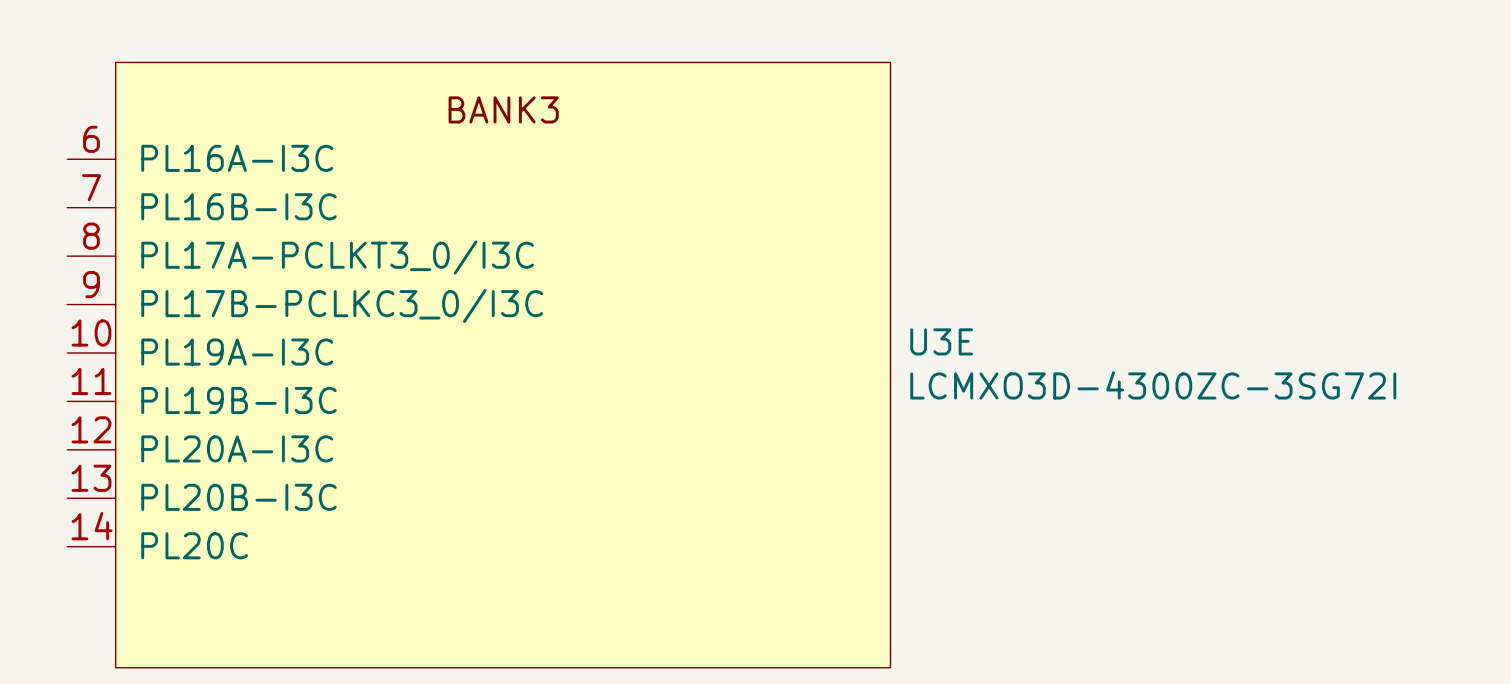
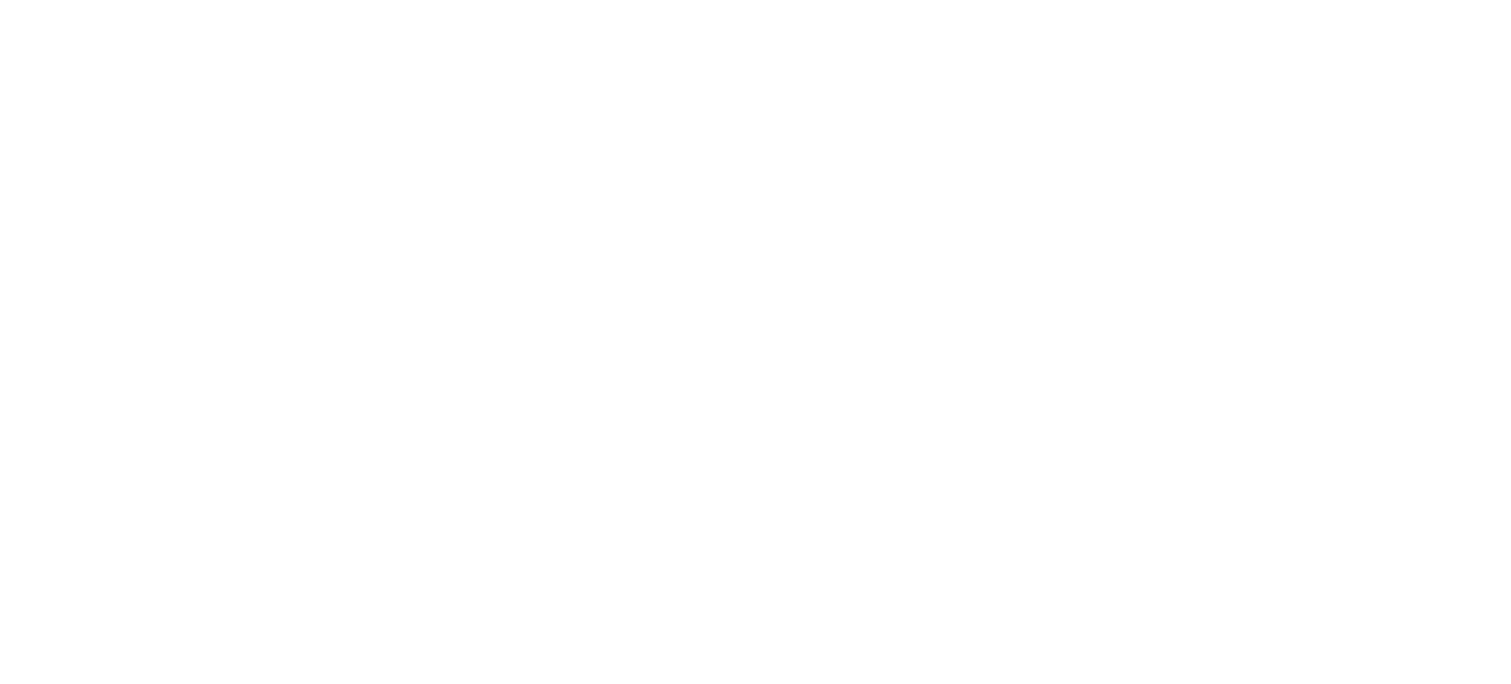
U3E: LCMXO3D-4300ZC-3SG72I (478, 365) -> none

